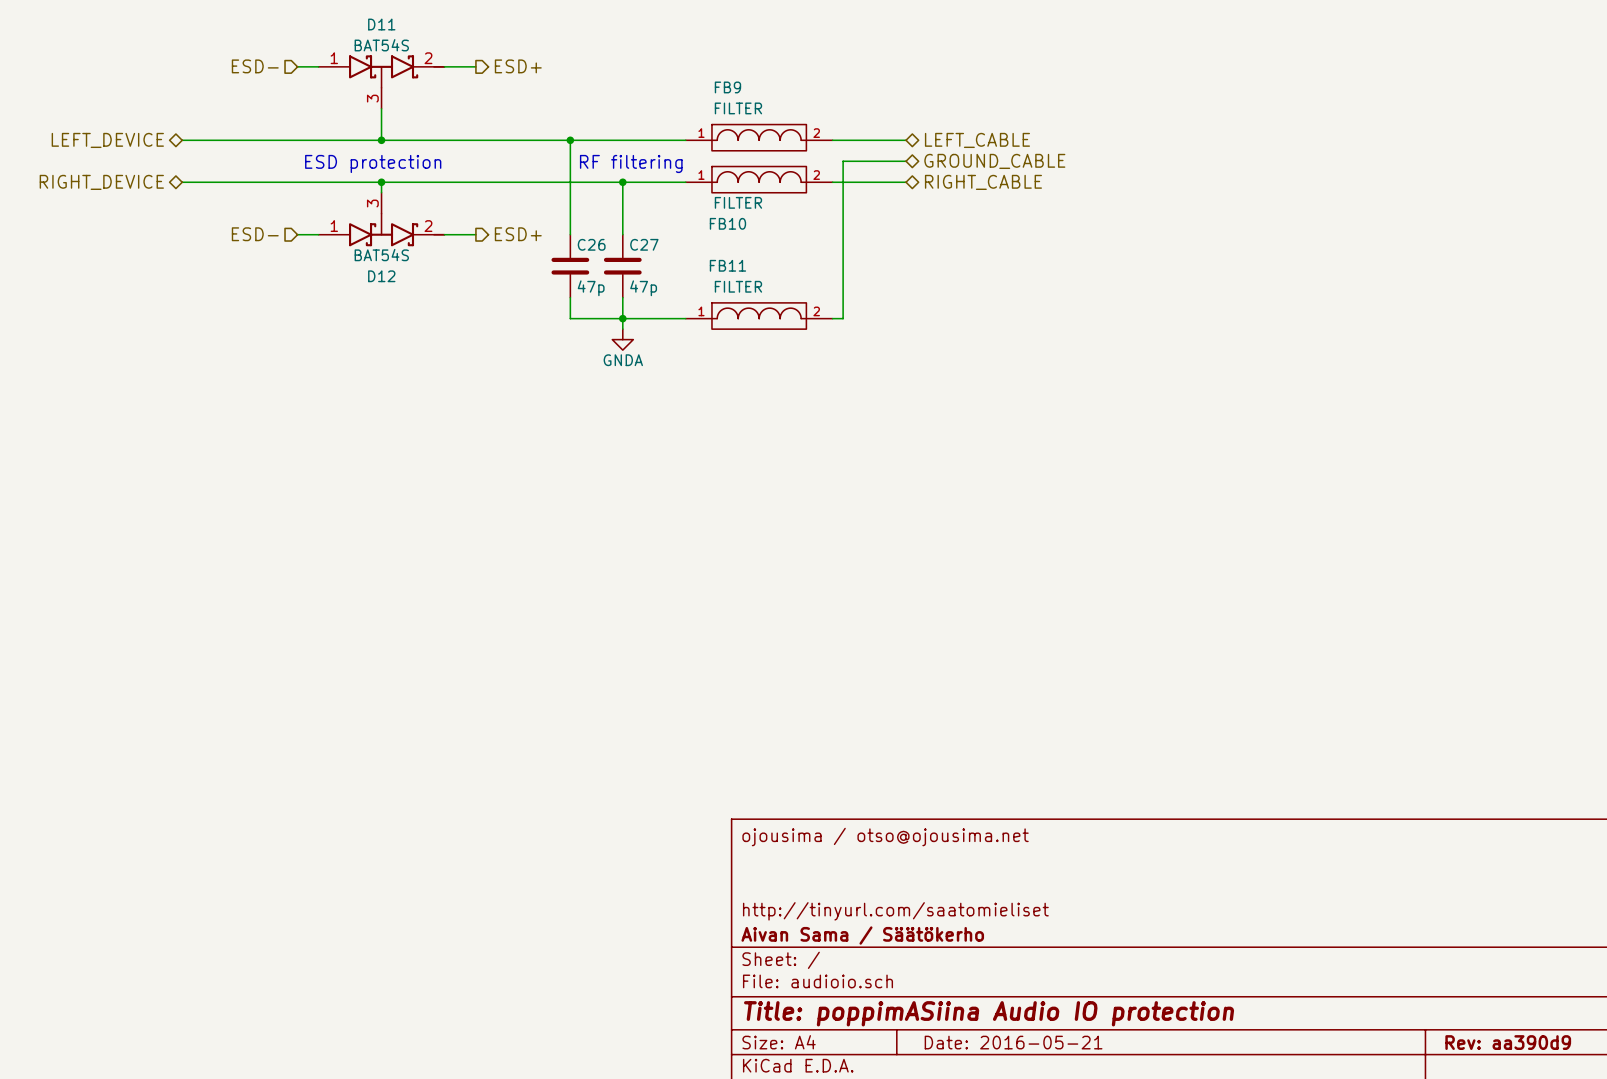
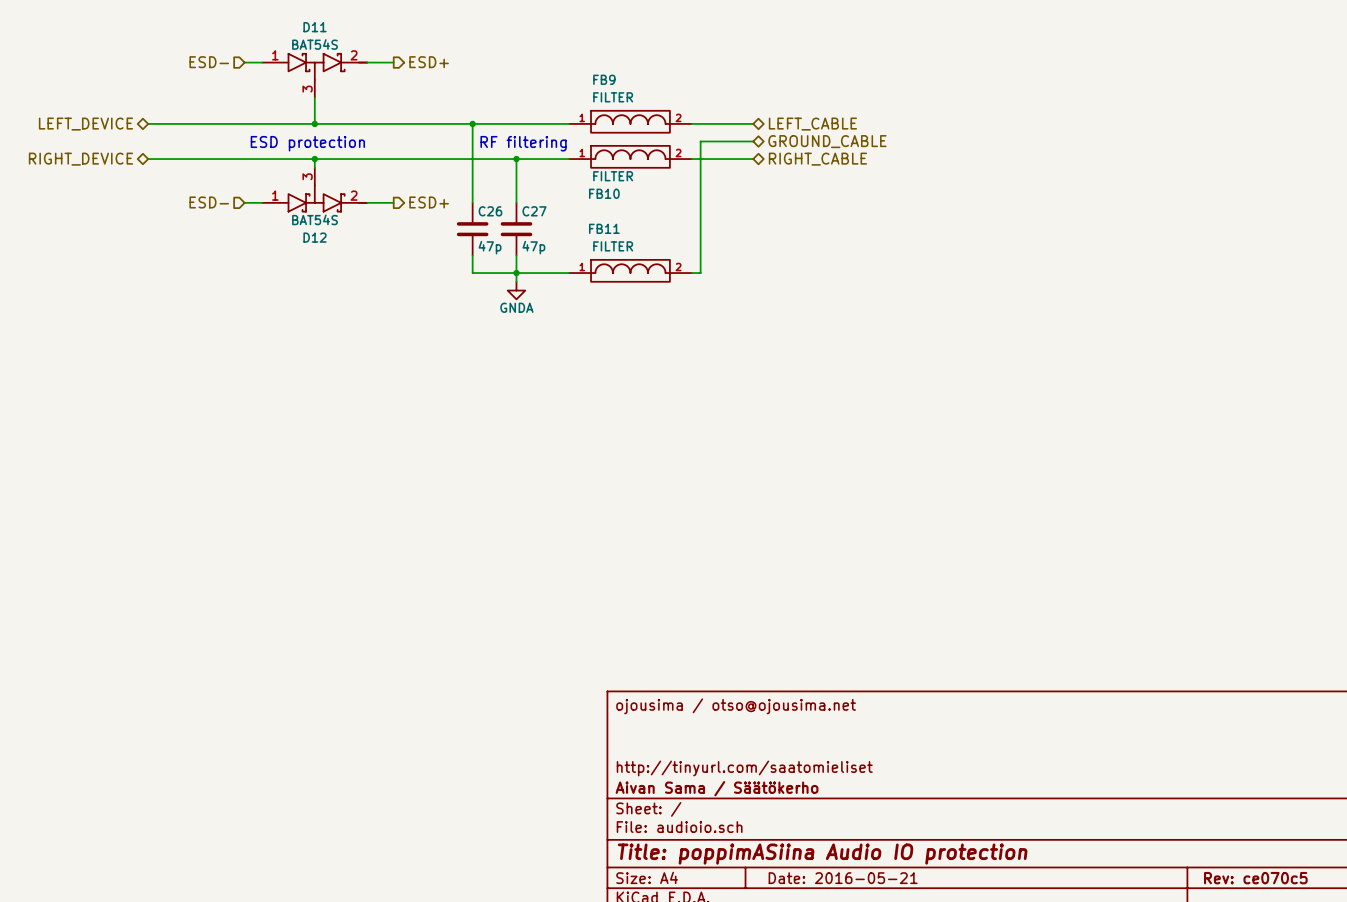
title block: Rev: aa390d9 (1508, 1042) -> Rev: ce070c5 (1255, 878)

